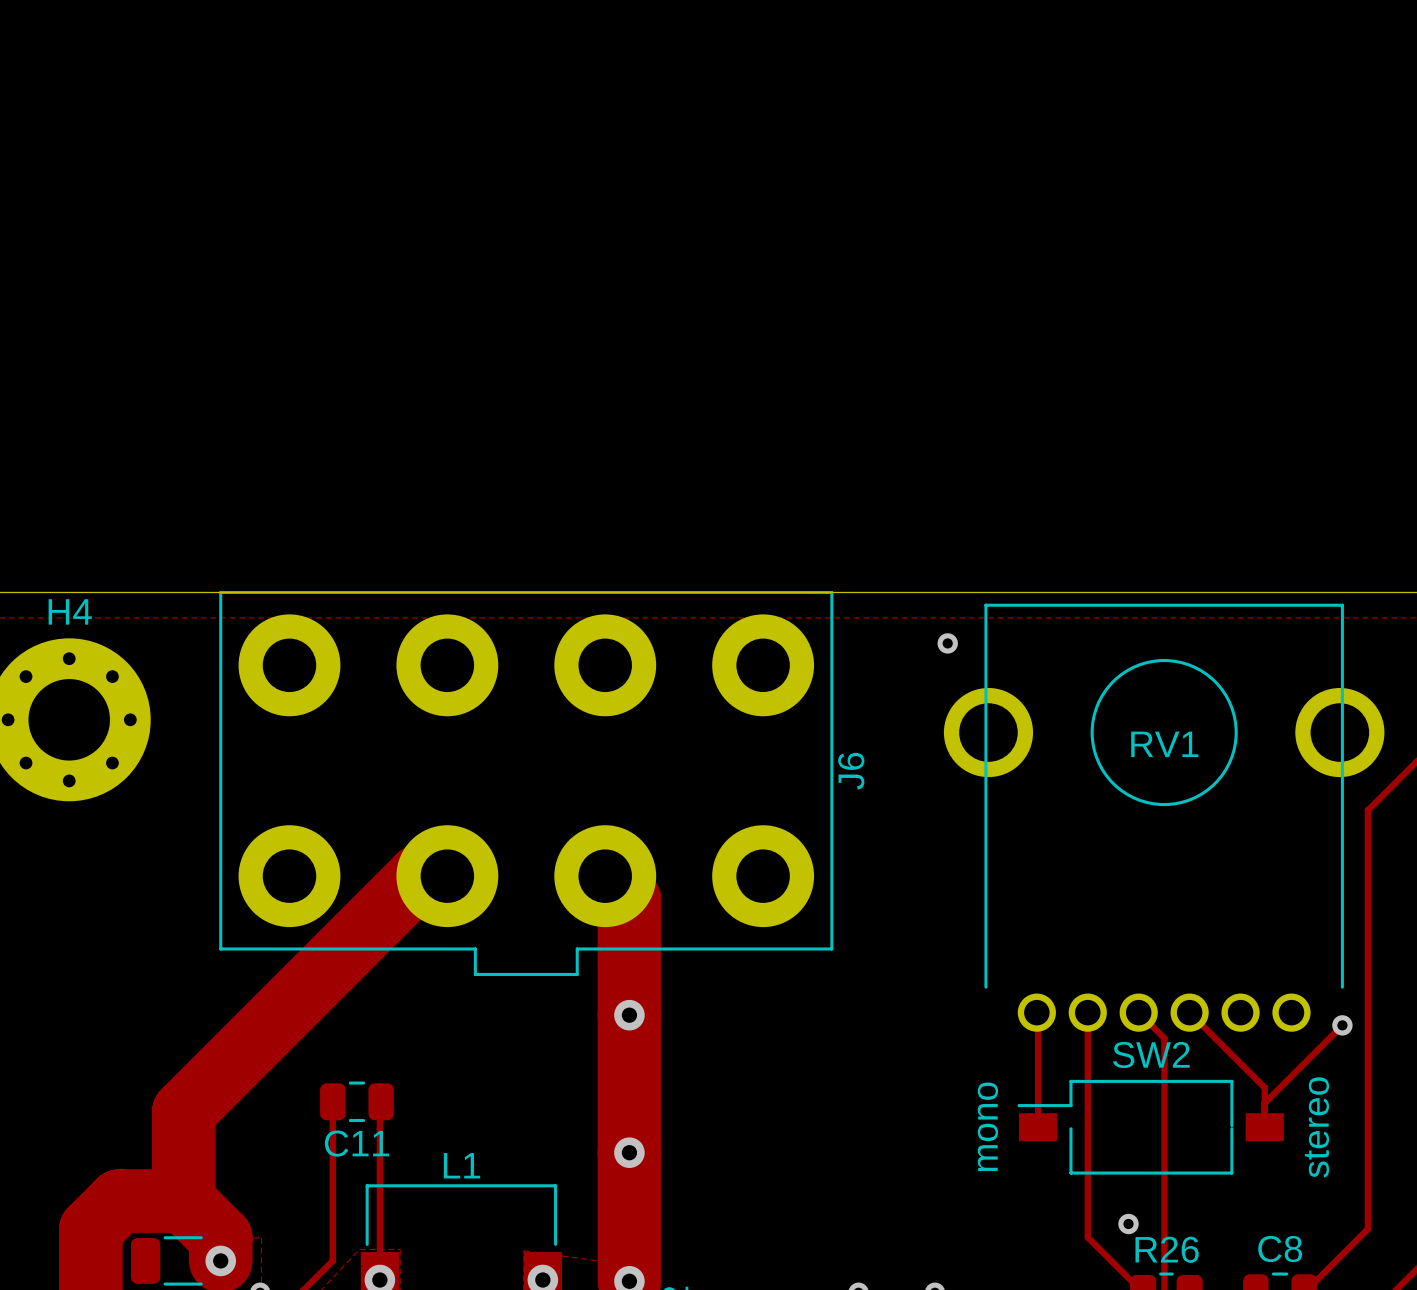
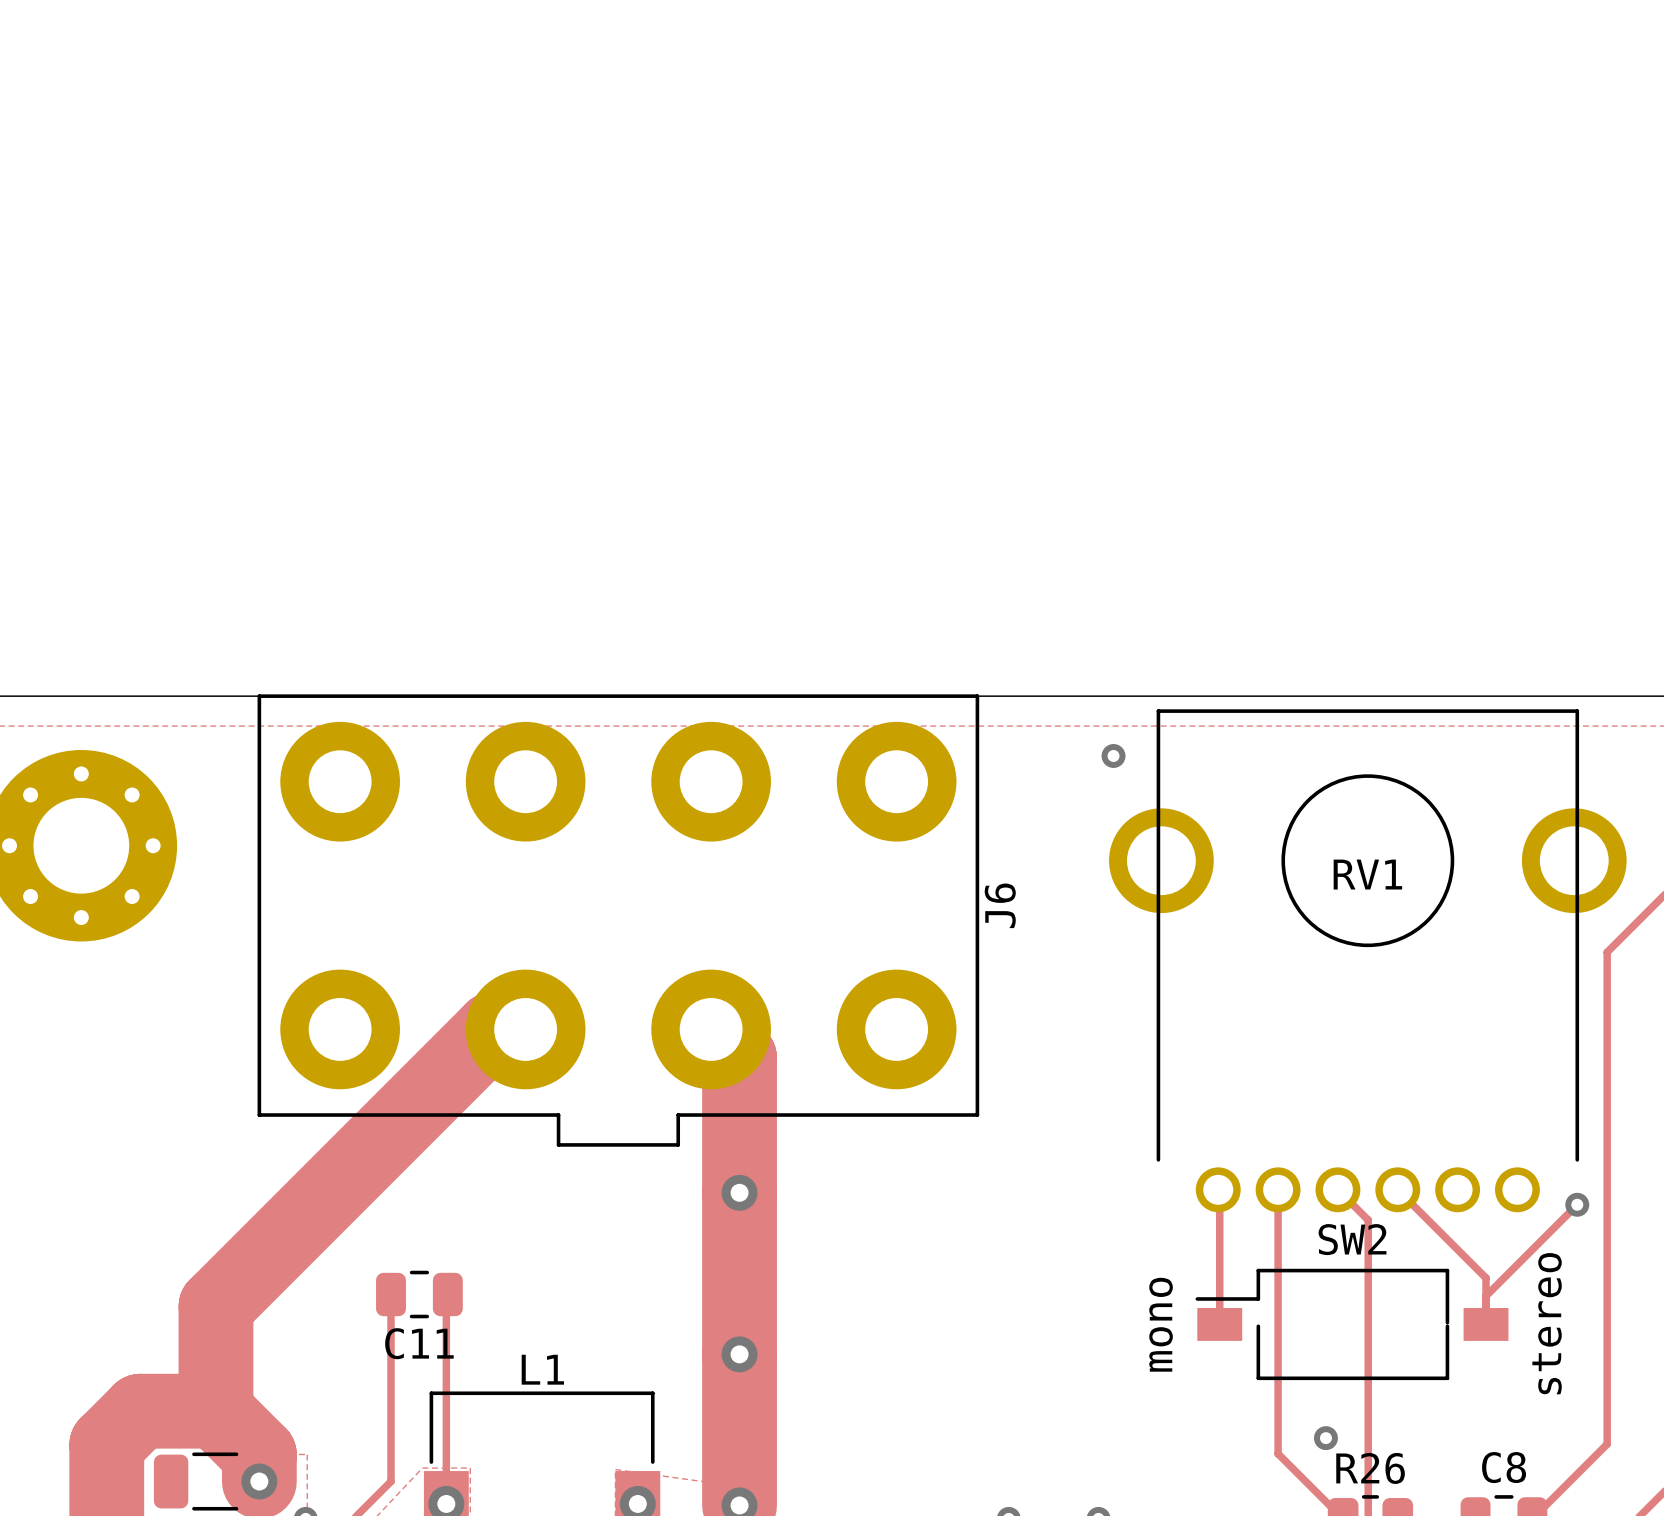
H4 name: H4 (70, 611) -> none

